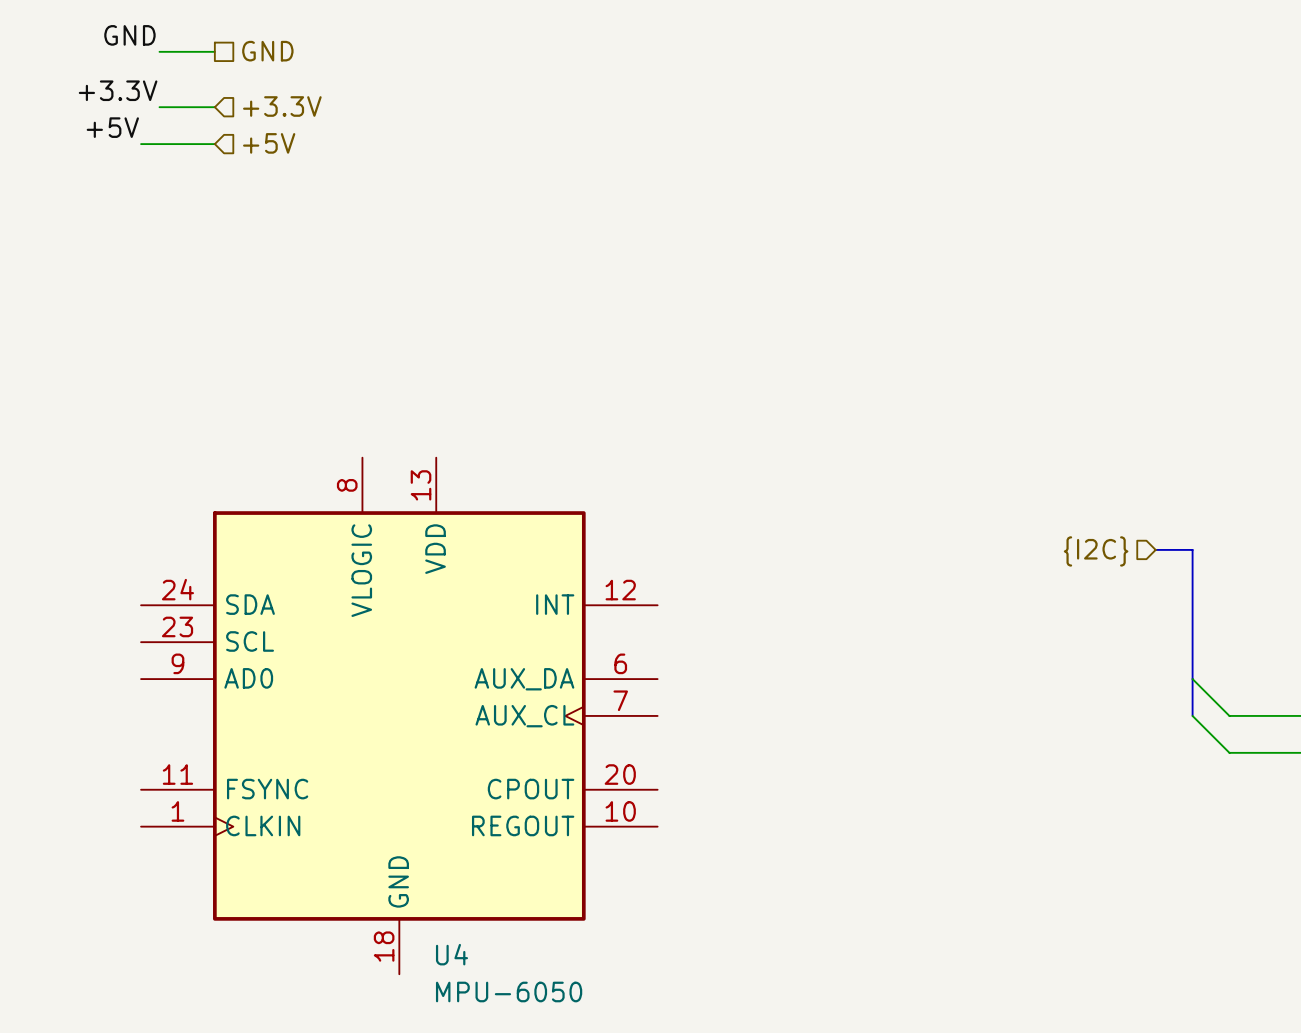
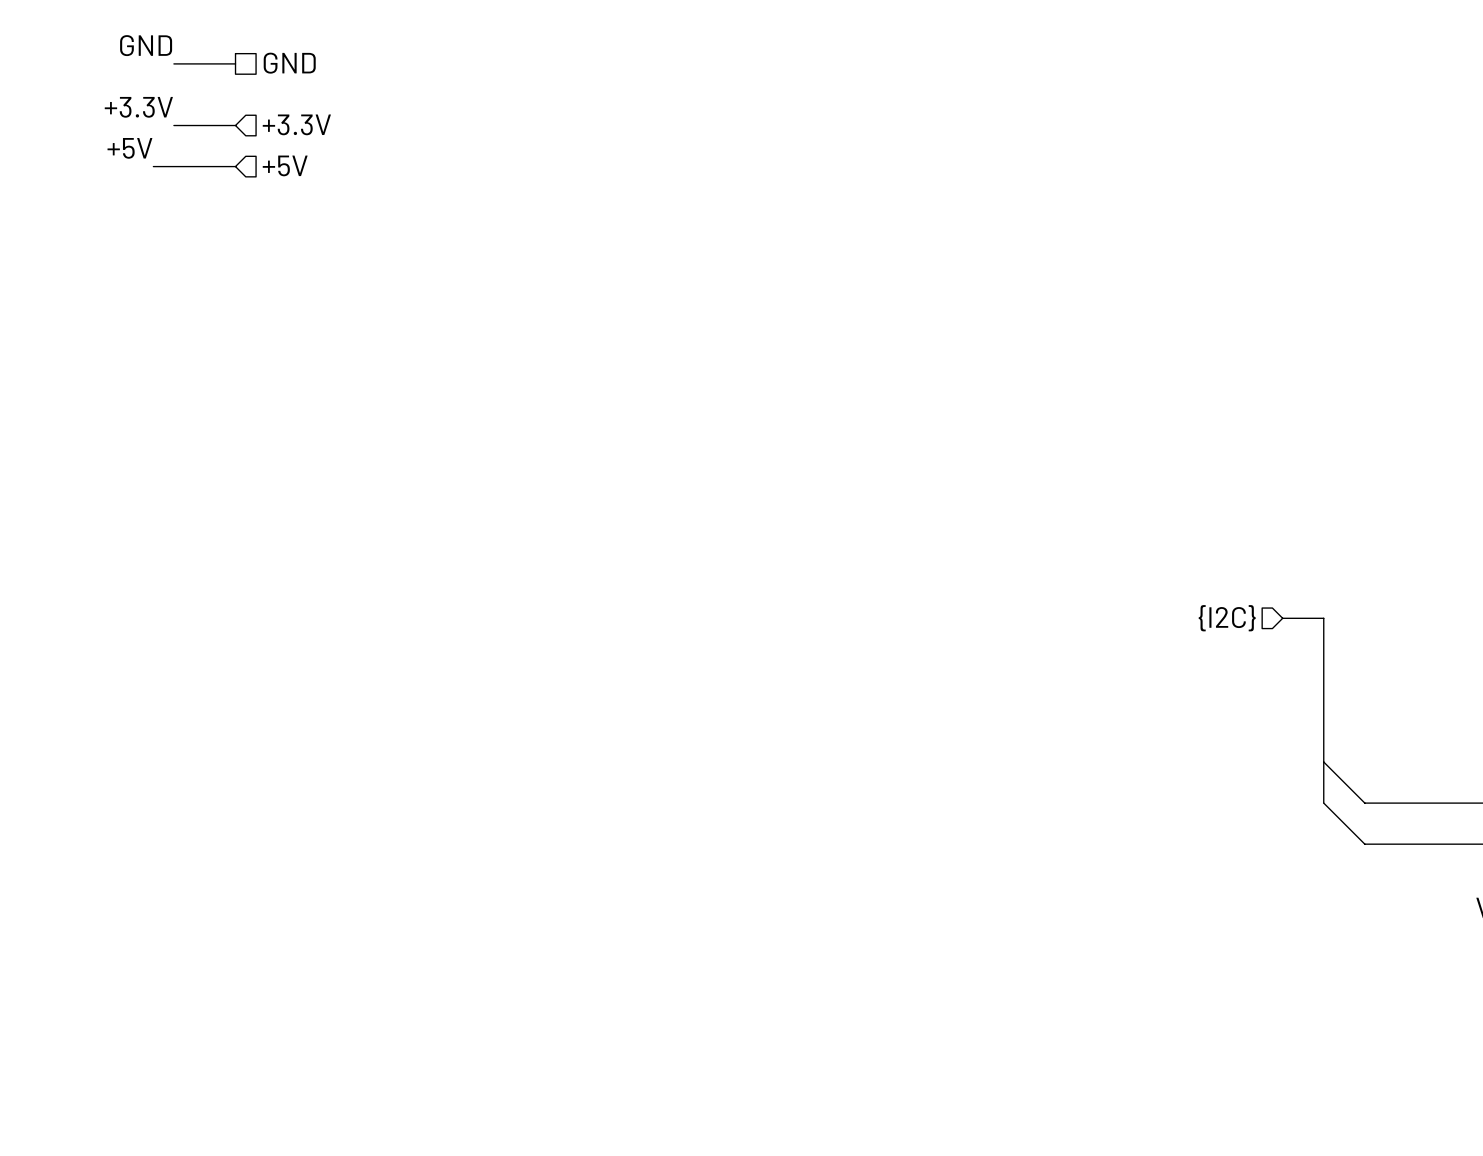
U4: MPU-6050 (399, 715) -> none

